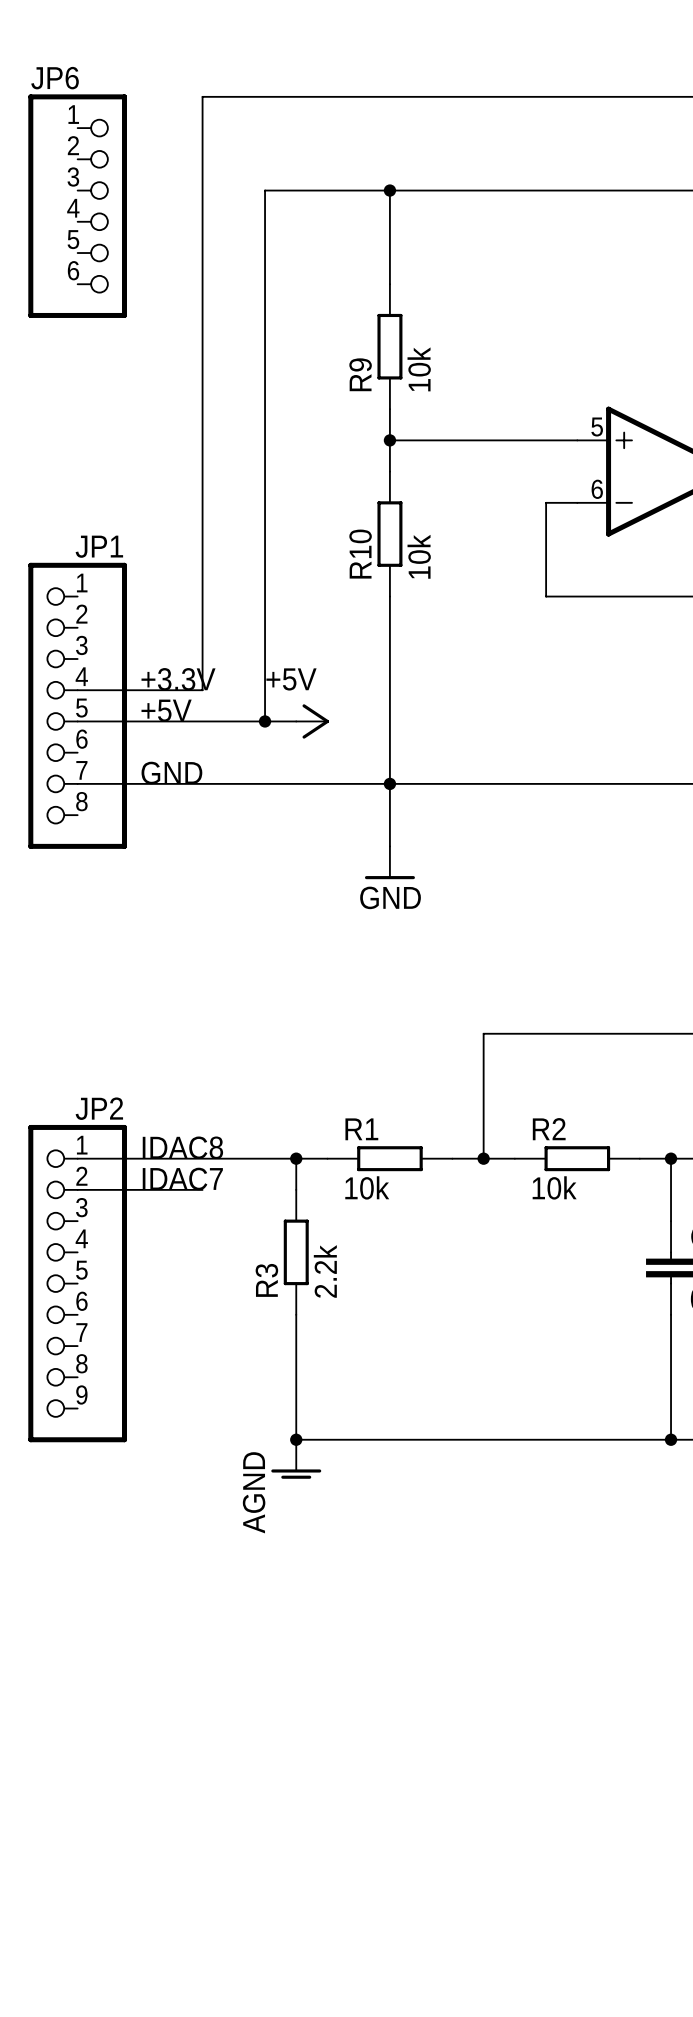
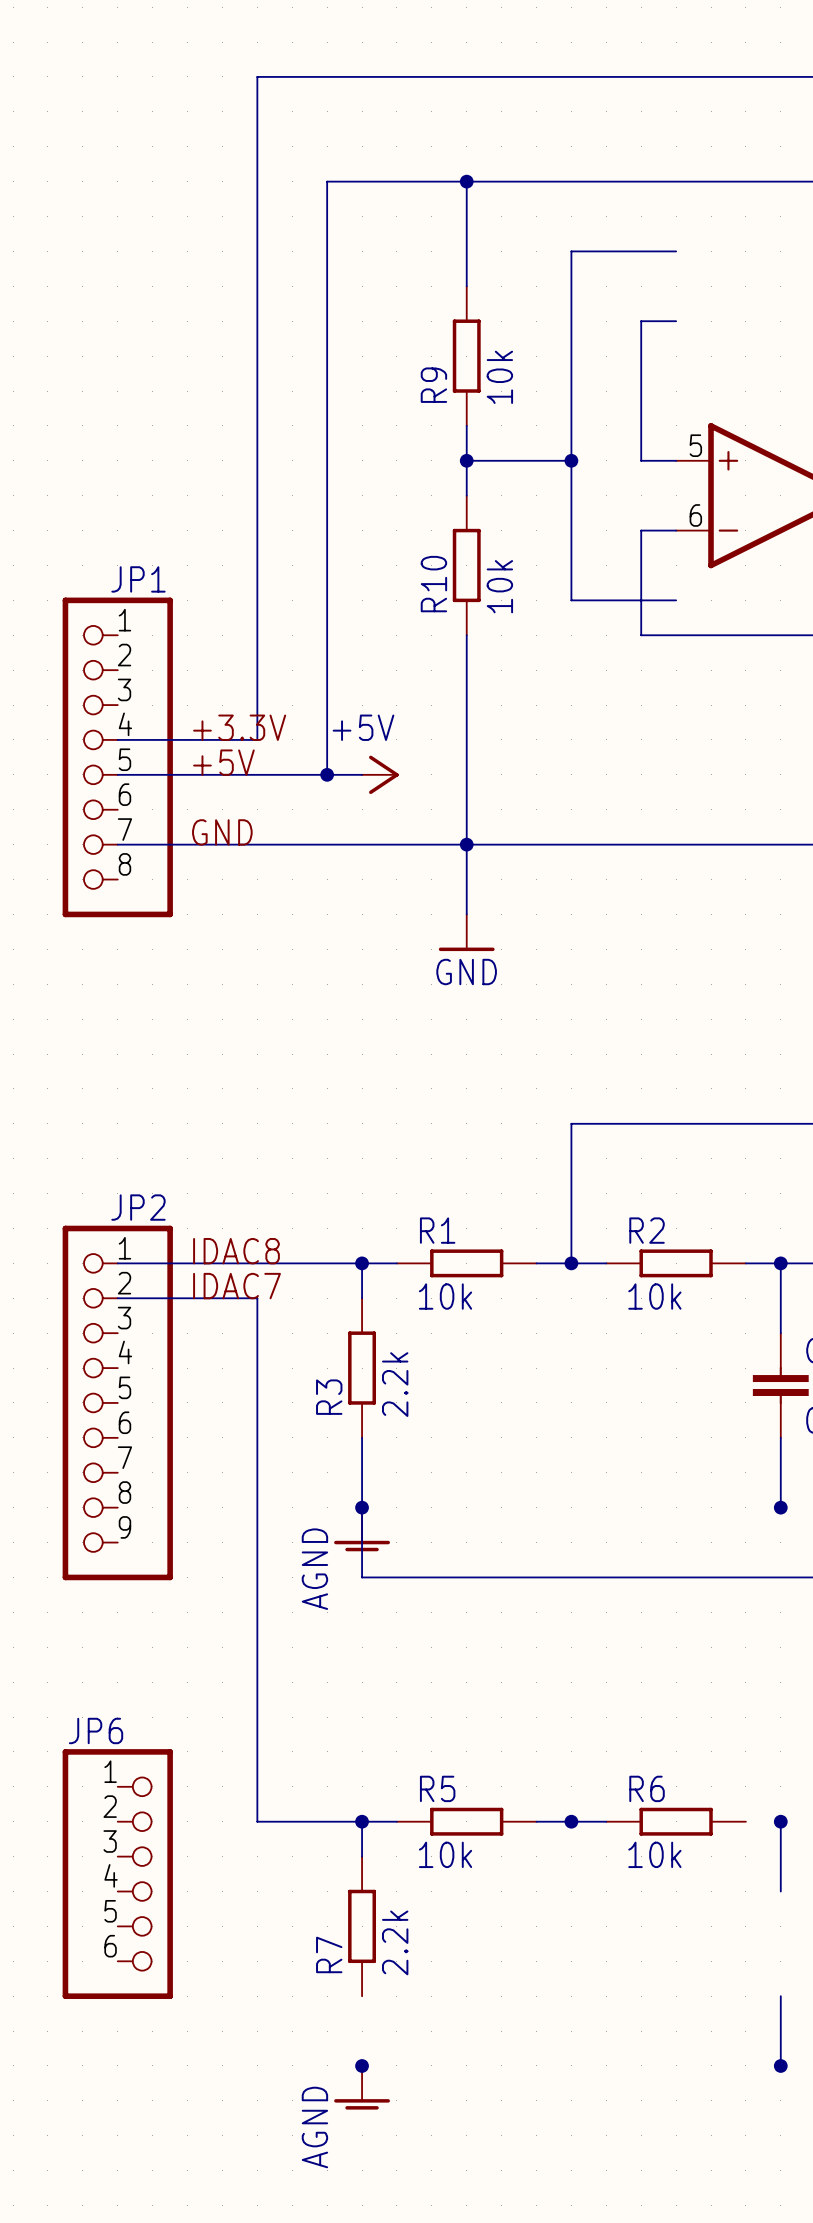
JP6 position: (77, 206) -> (117, 1874)
wire: none -> (676, 251) (571, 251) (571, 600) (676, 600)
wire: (483, 440) (546, 440) -> (676, 321) (641, 321) (641, 460)
junction: none -> (571, 460)
wire: none -> (257, 1298) (257, 1821) (396, 1821)
wire: (671, 1377) (671, 1439) -> (780, 1821) (780, 1891)
junction position: (296, 1439) -> (362, 1507)
junction position: (671, 1439) -> (780, 1507)
power symbol position: AGND (296, 1459) -> AGND (362, 1529)
wire: none -> (362, 1821) (362, 1856)
junction: none -> (362, 1821)
R5: none -> 10k (466, 1821)
wire: none -> (536, 1821) (606, 1821)
junction: none -> (571, 1821)
R6: none -> 10k (676, 1821)
junction: none -> (780, 1821)
R7: none -> 2.2k (362, 1926)
wire: none -> (780, 1996) (780, 2065)
junction: none -> (362, 2065)
junction: none -> (780, 2065)
power symbol: none -> AGND (362, 2087)

